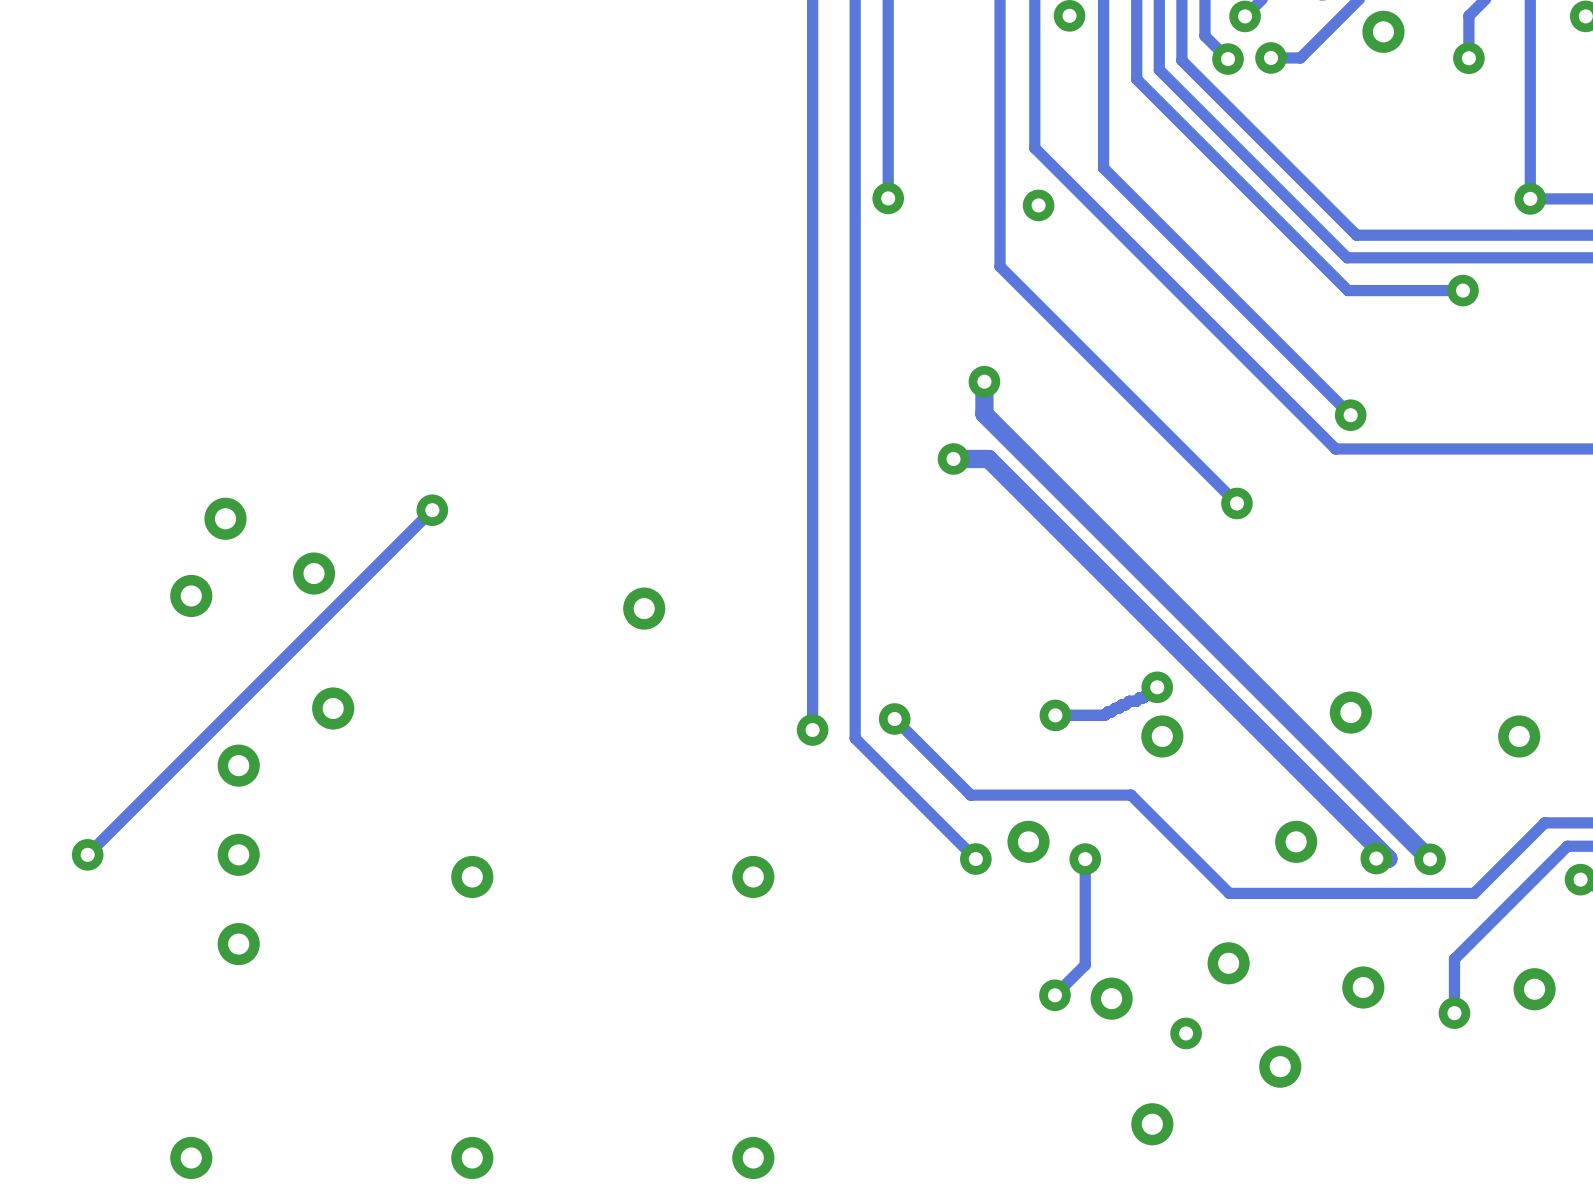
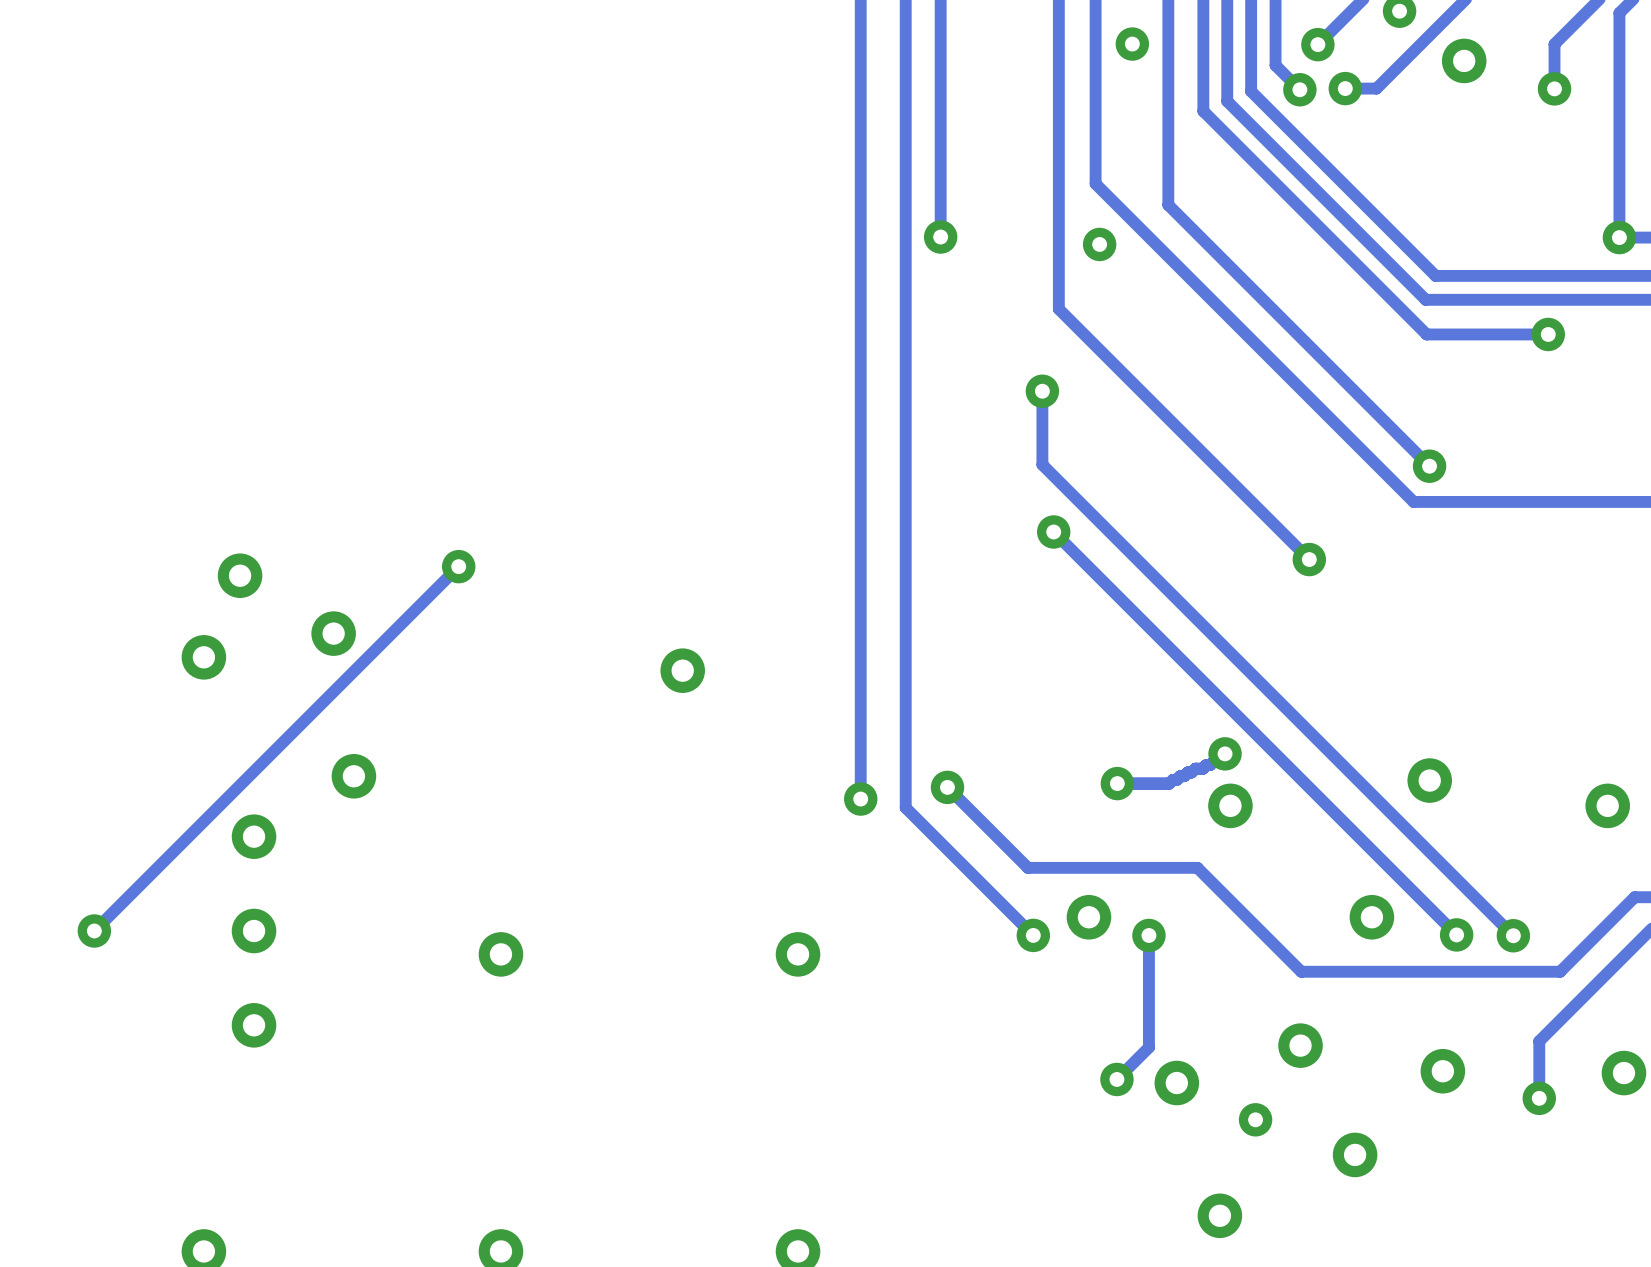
track width: thick (984, 381) (984, 414) (1429, 859) -> thin (1042, 430) (1042, 464) (1513, 935)
via position: (984, 381) -> (1042, 391)
track: (953, 458) (988, 458) (1388, 858) (1376, 858) -> (1053, 531) (1456, 934)
via position: (953, 458) -> (1053, 531)

